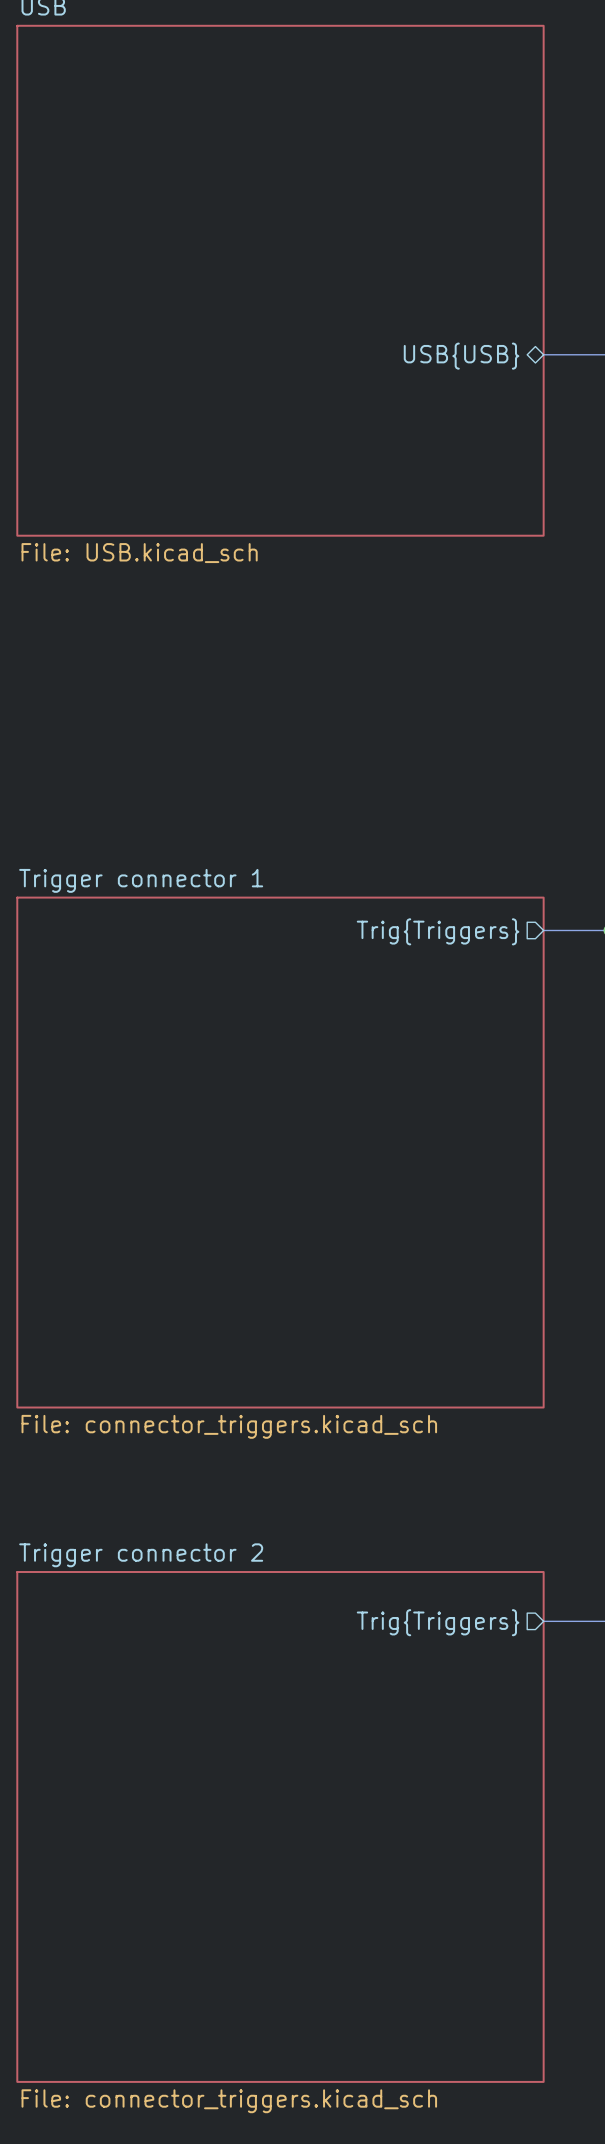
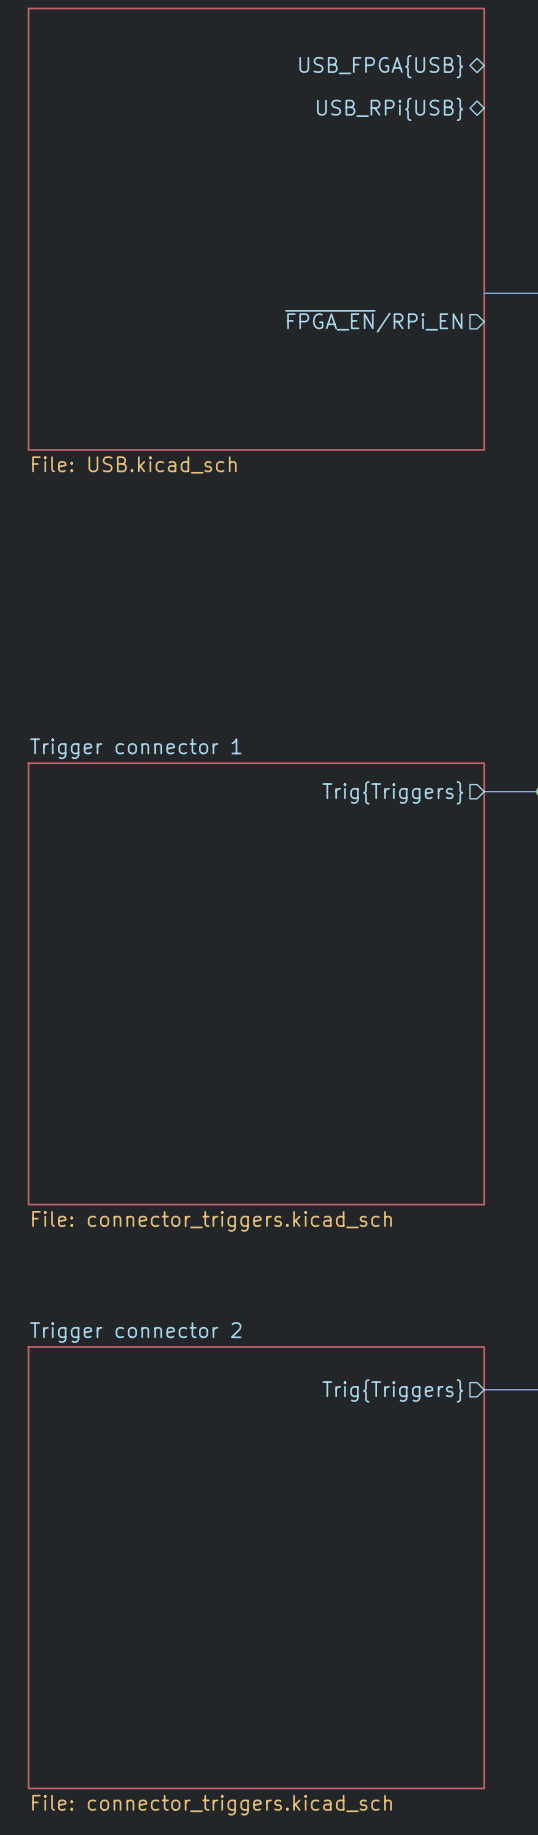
sheet pin: none -> USB_FPGA{USB} (381, 66)
sheet pin: none -> USB_RPi{USB} (390, 109)
sheet pin: USB{USB} (461, 356) -> none
sheet pin: none -> ~{FPGA_EN}/RPi_EN (373, 321)

